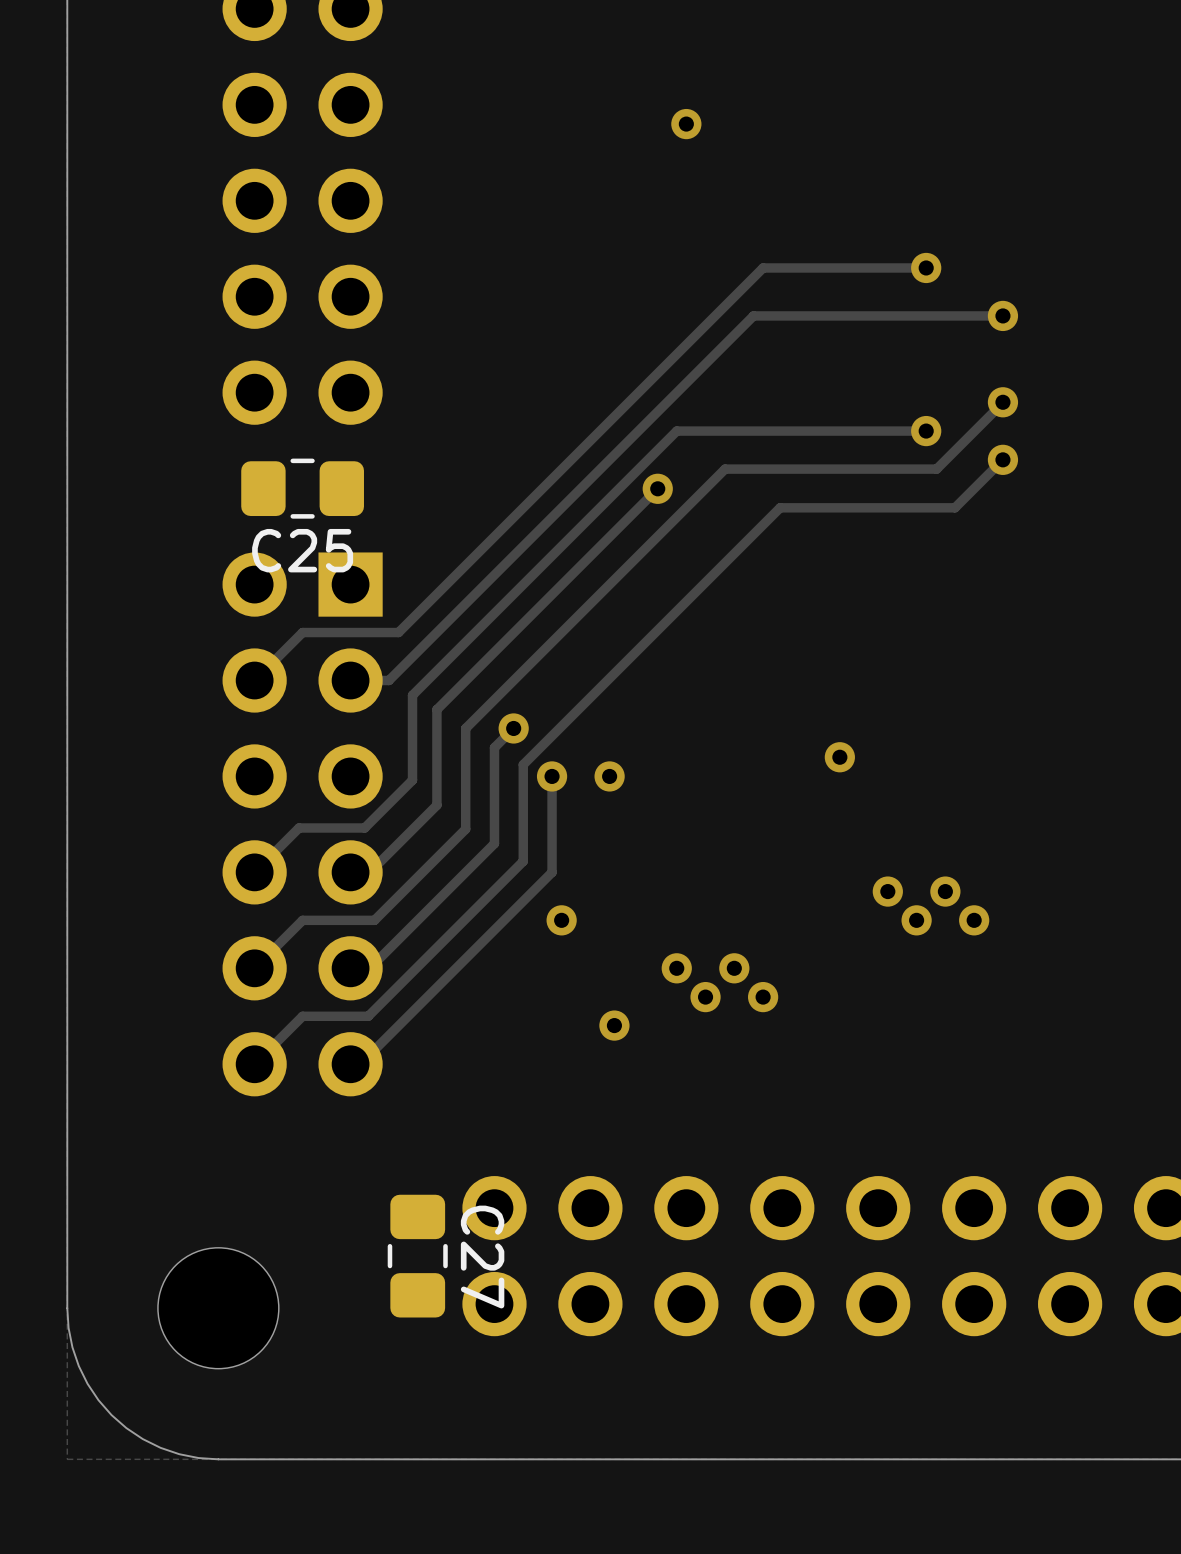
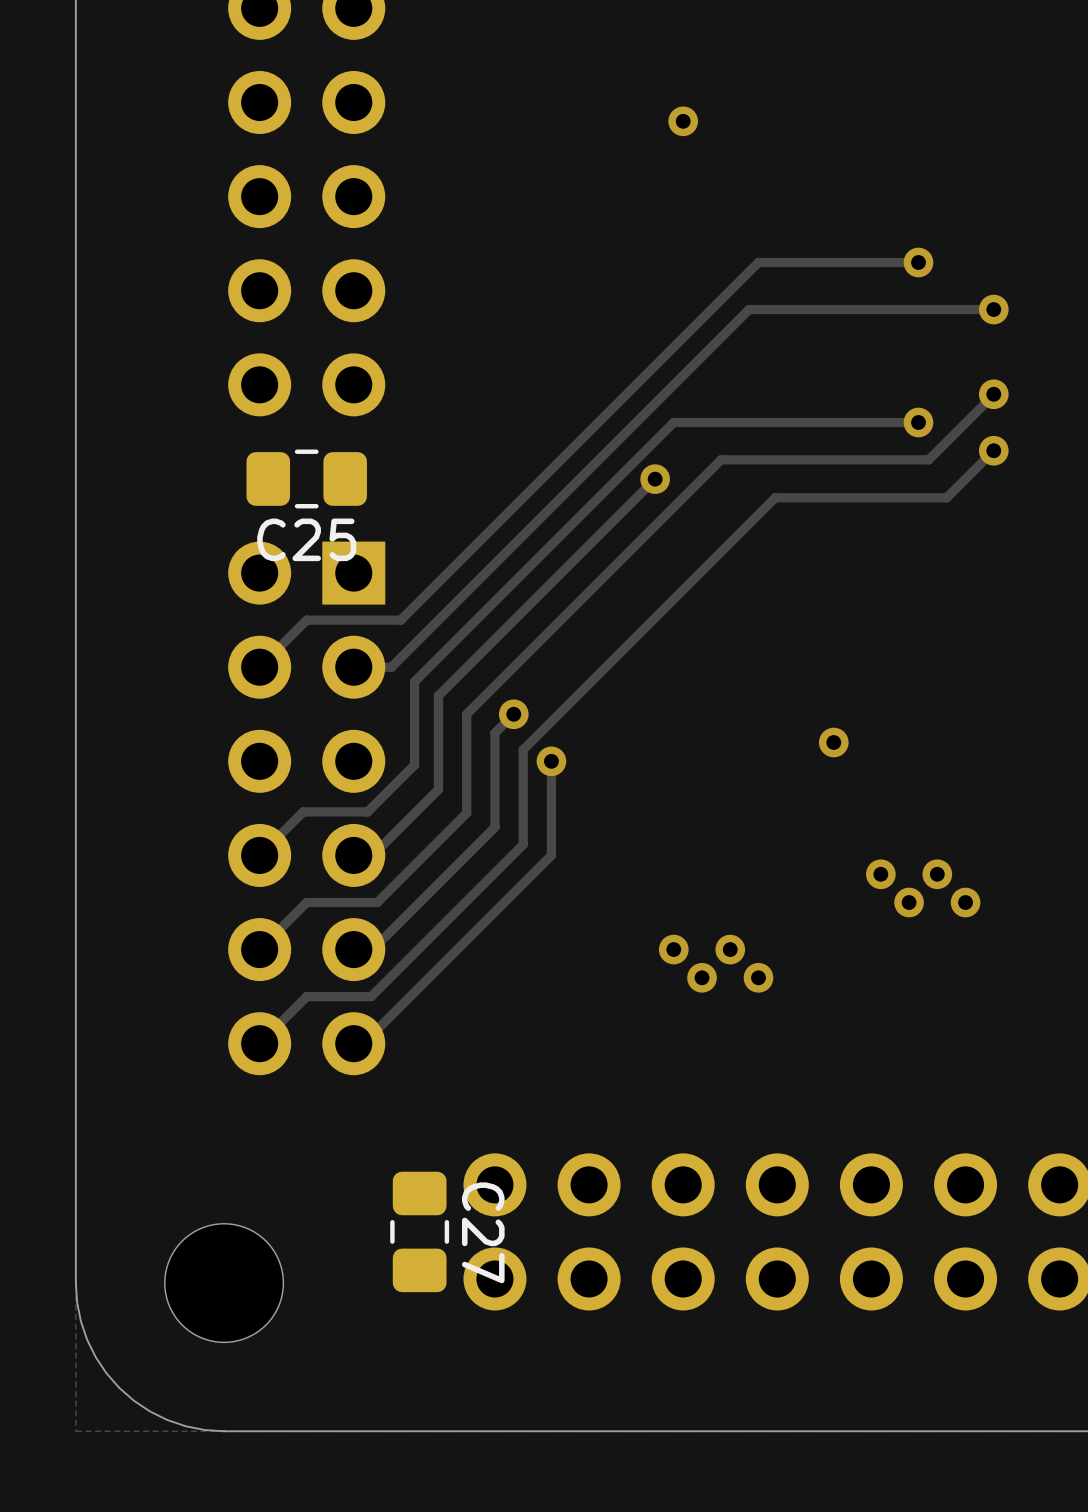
via: (609, 776) -> none
via: (561, 920) -> none
via: (614, 1025) -> none

